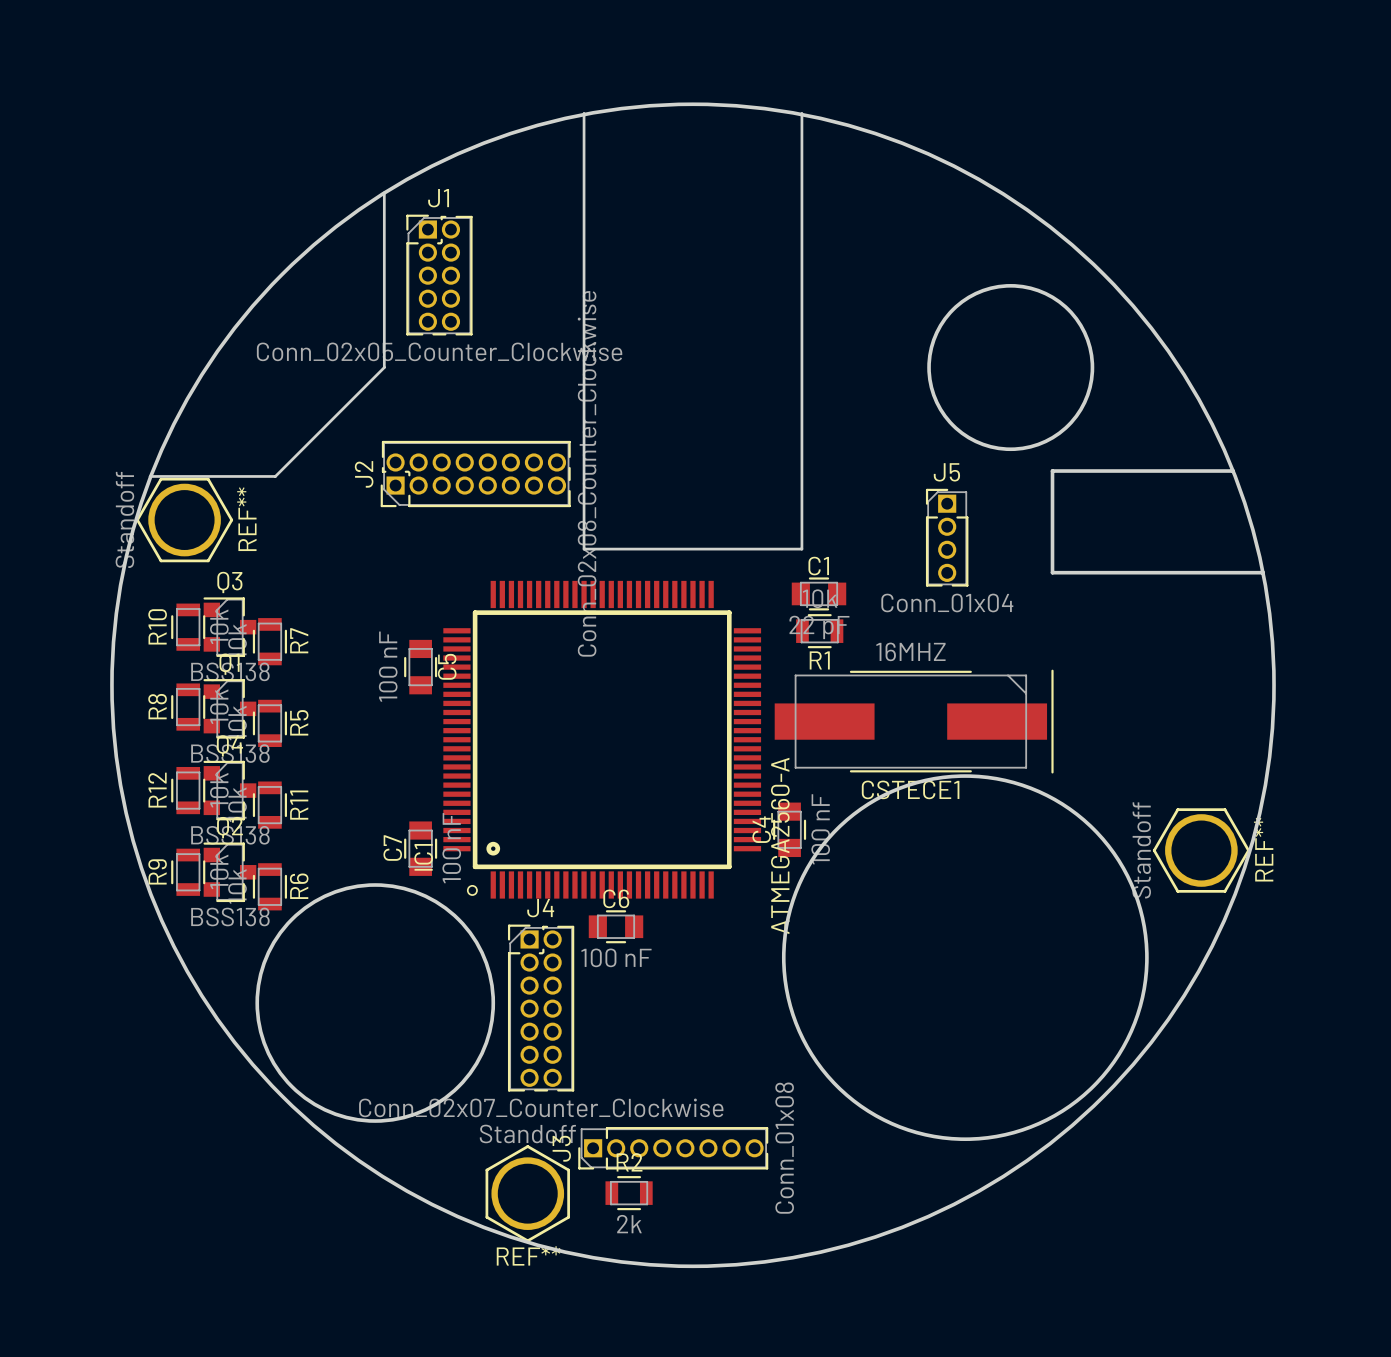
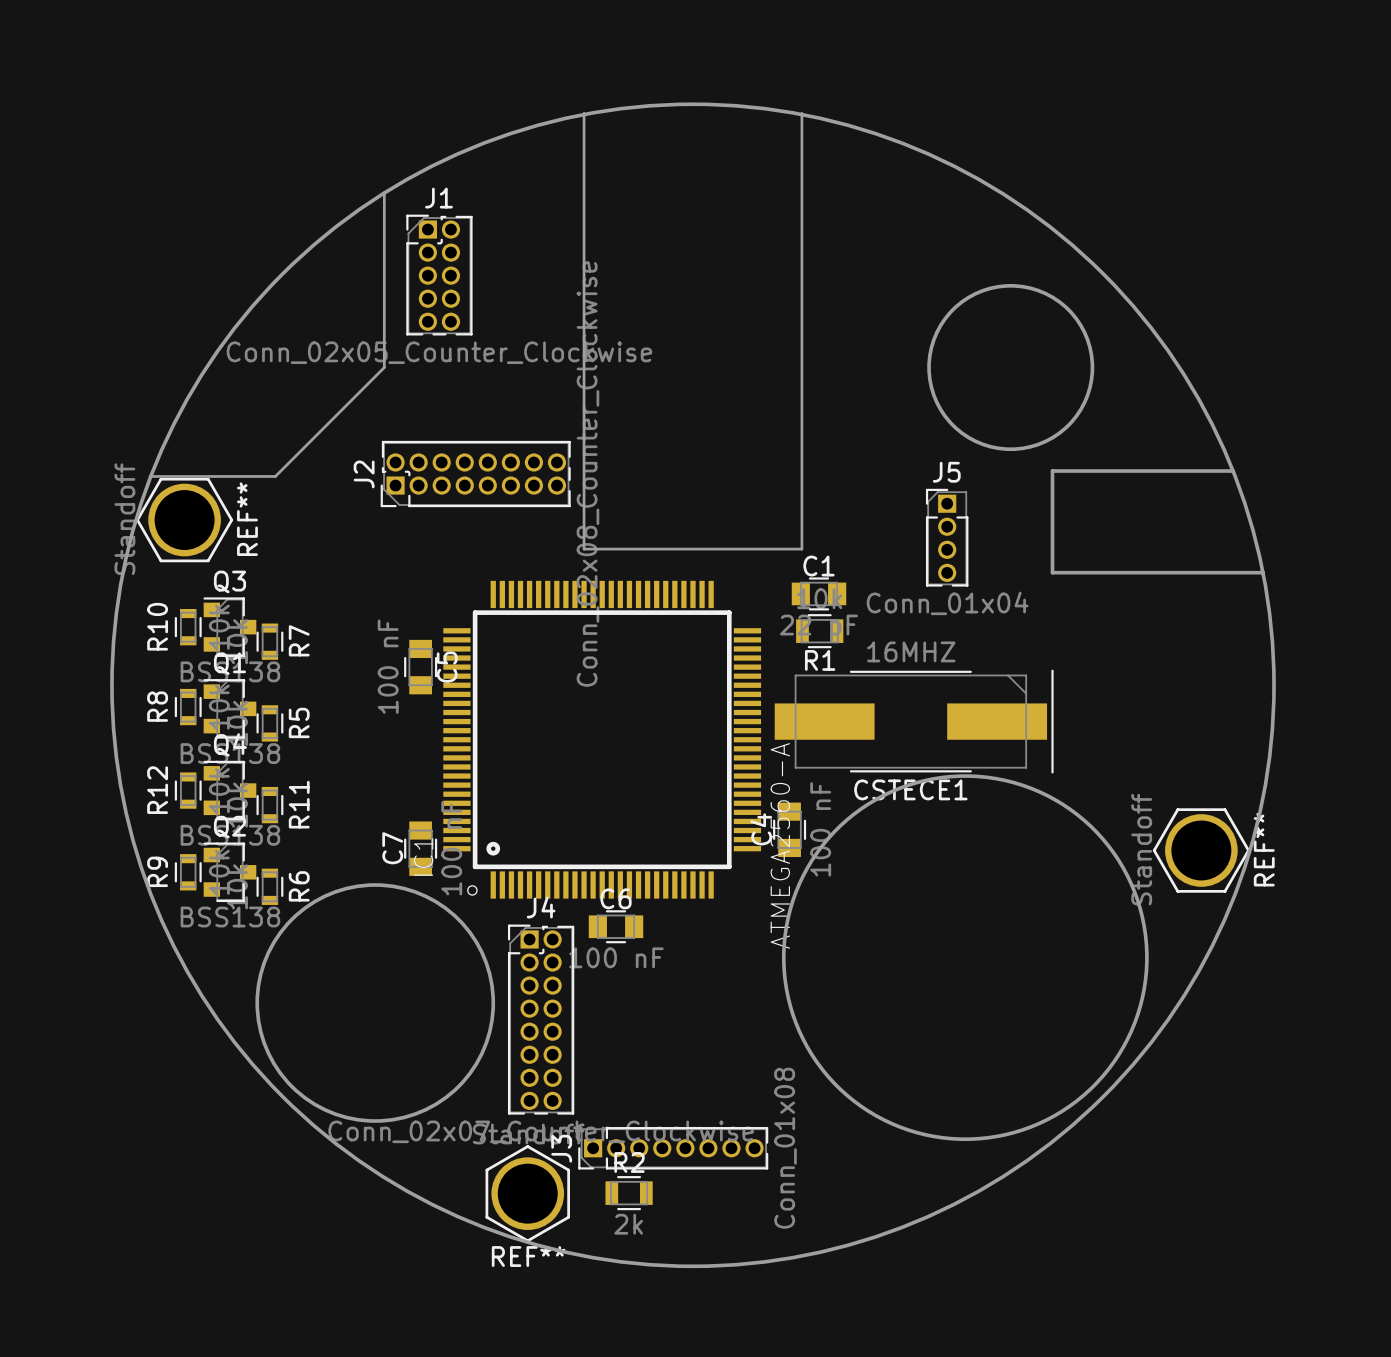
R10 footprint: [171, 603, 206, 651] -> [174, 609, 202, 646]
R7 footprint: [252, 618, 288, 666] -> [256, 623, 284, 660]
R8 footprint: [171, 683, 206, 731] -> [174, 688, 202, 726]
R5 footprint: [252, 699, 288, 748] -> [256, 705, 284, 742]
R12 footprint: [171, 766, 206, 815] -> [174, 772, 202, 809]
R11 footprint: [252, 781, 288, 829] -> [256, 786, 284, 824]
R9 footprint: [171, 848, 206, 896] -> [174, 854, 202, 891]
R6 footprint: [252, 863, 288, 911] -> [256, 868, 284, 905]
J4 footprint: [507, 924, 575, 1092] -> [507, 924, 575, 1115]

